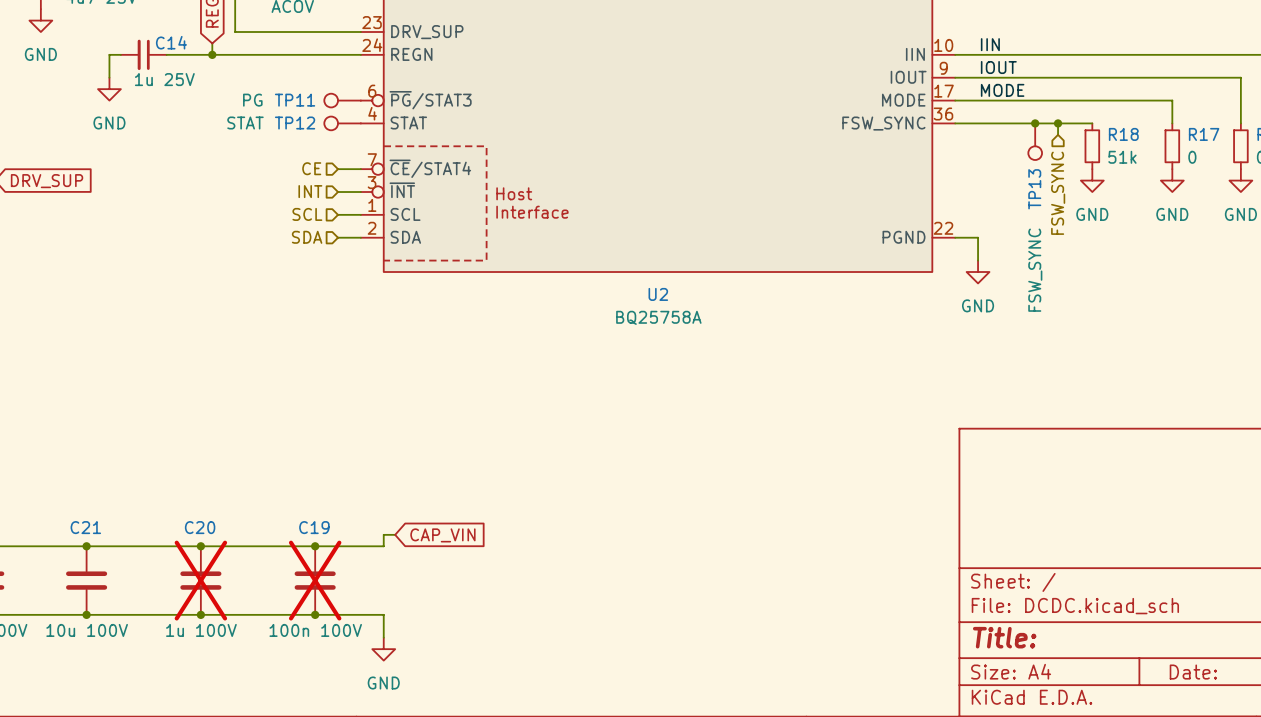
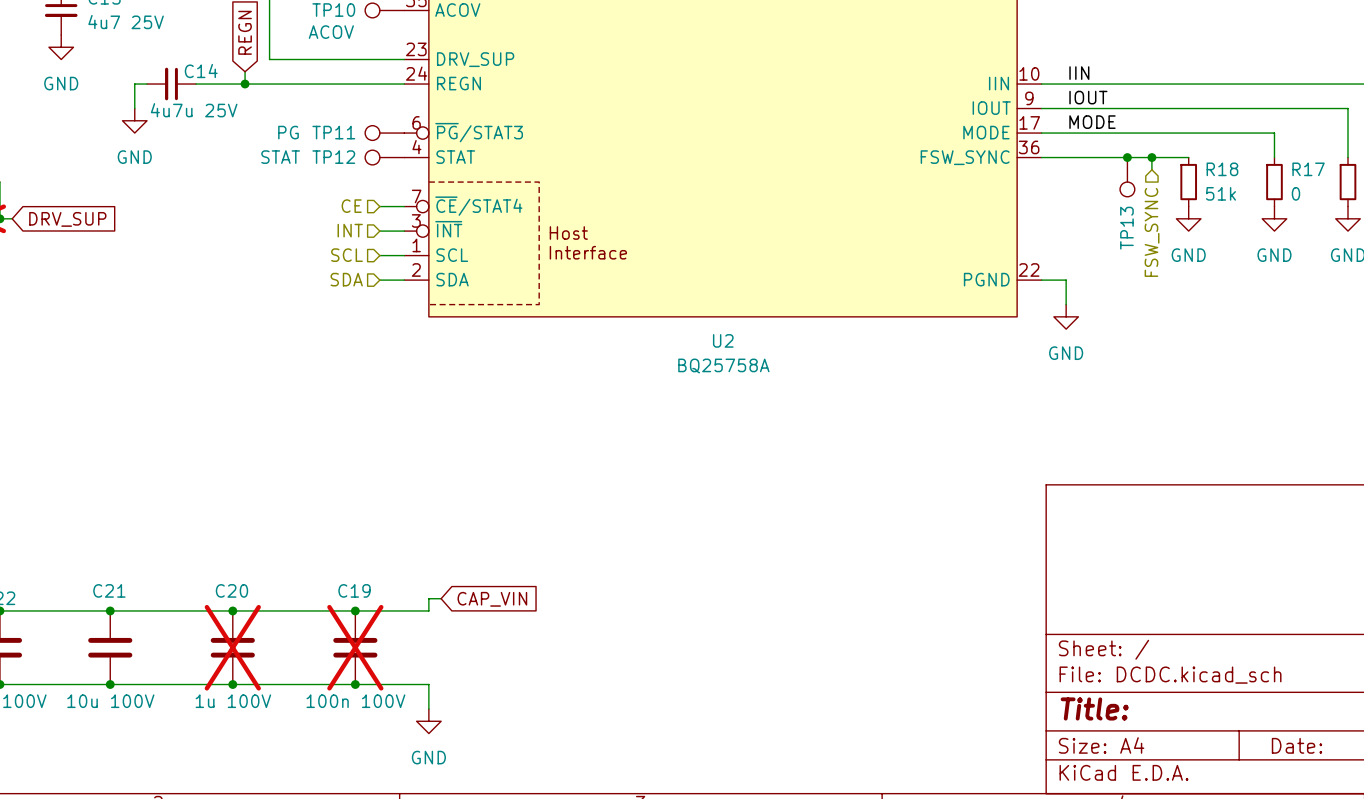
C14 value: 1u 25V (164, 79) -> 4u7u 25V (194, 110)
TP13 value: FSW_SYNC (1035, 270) -> none

